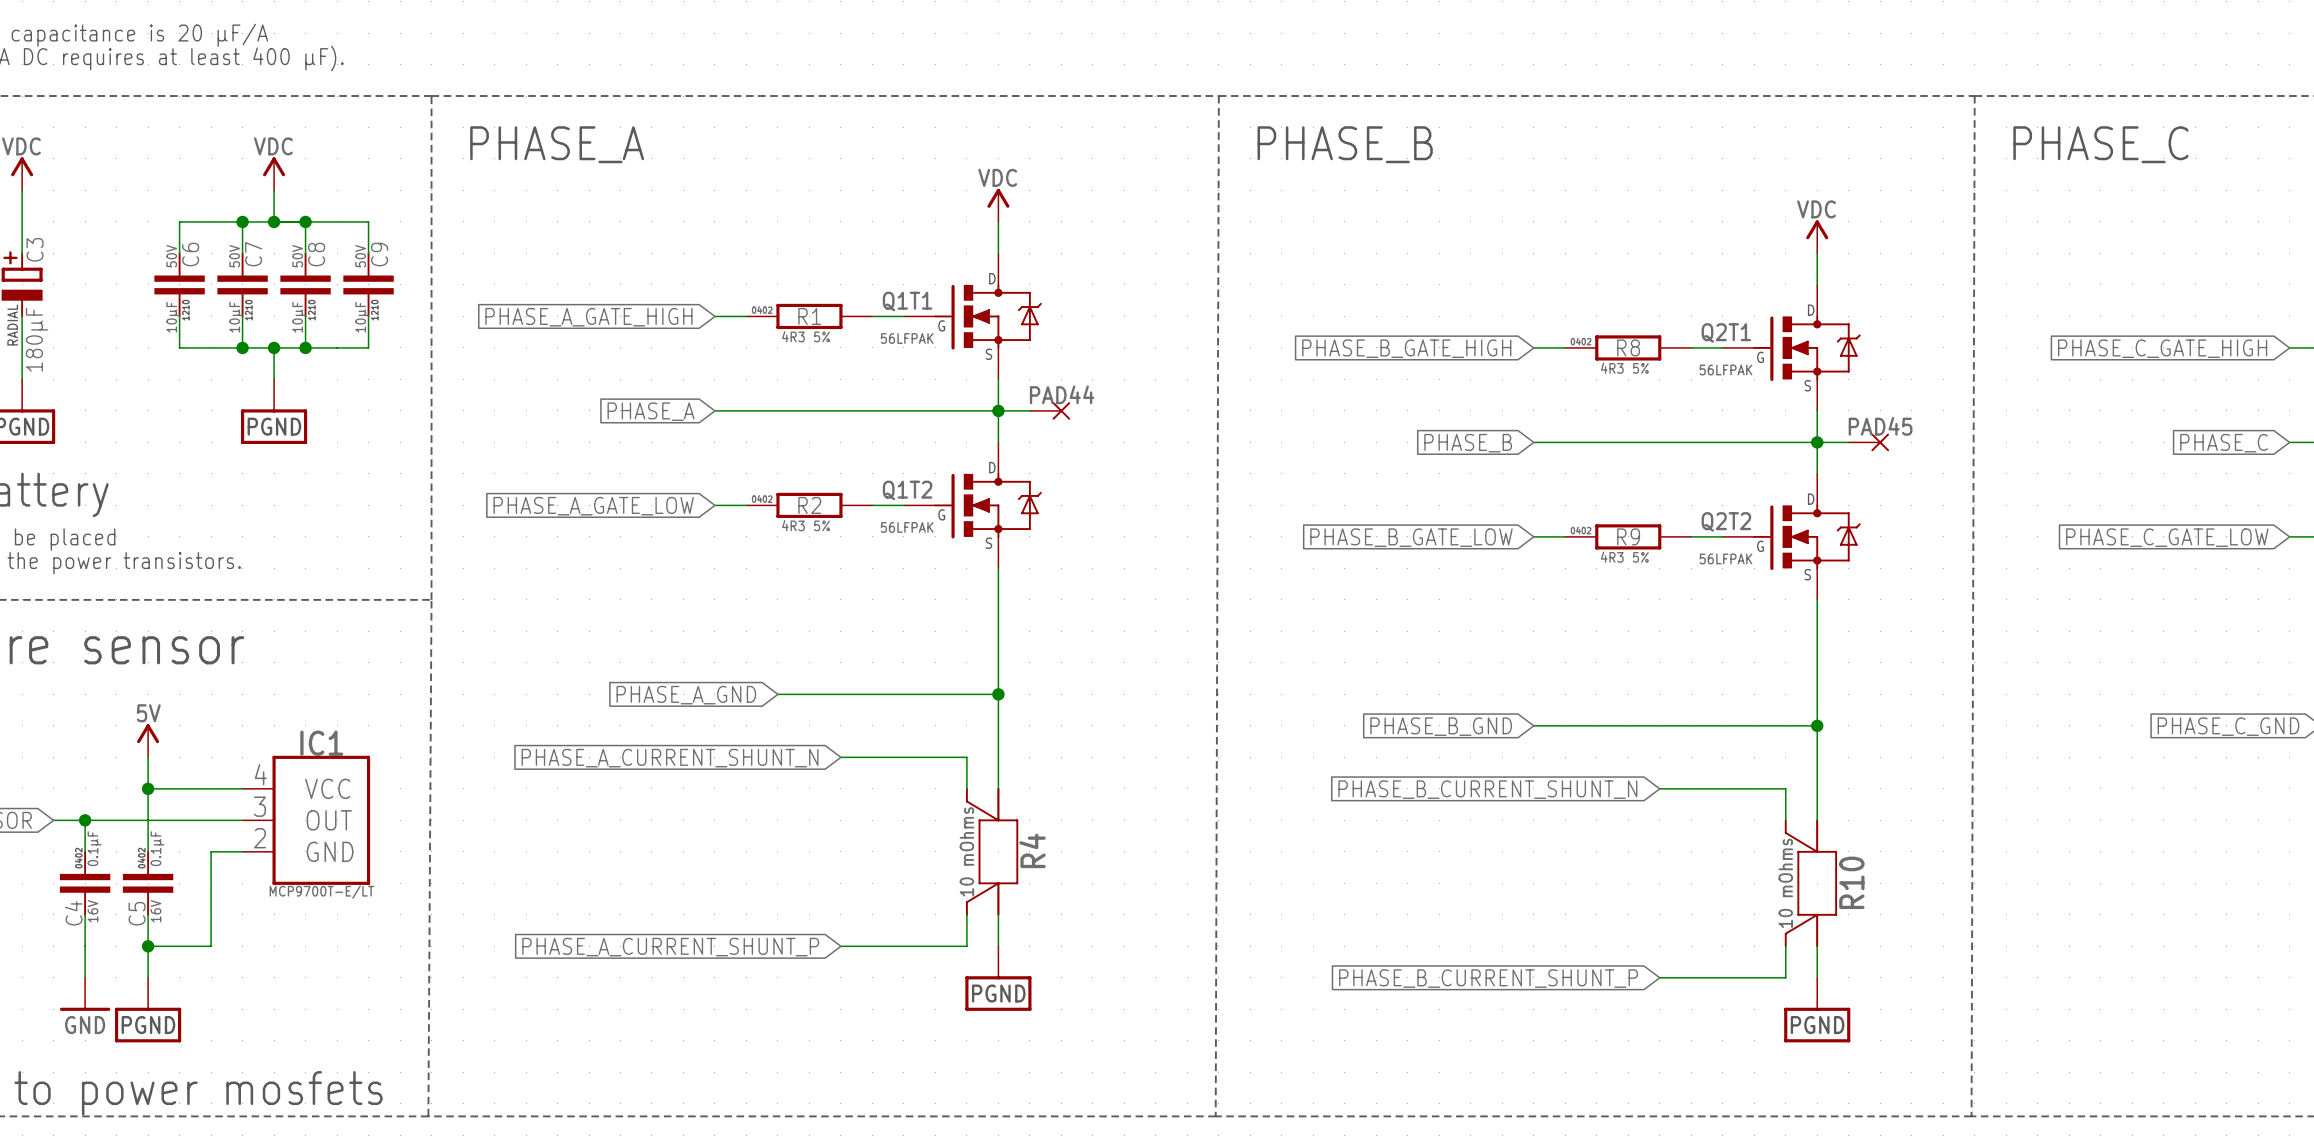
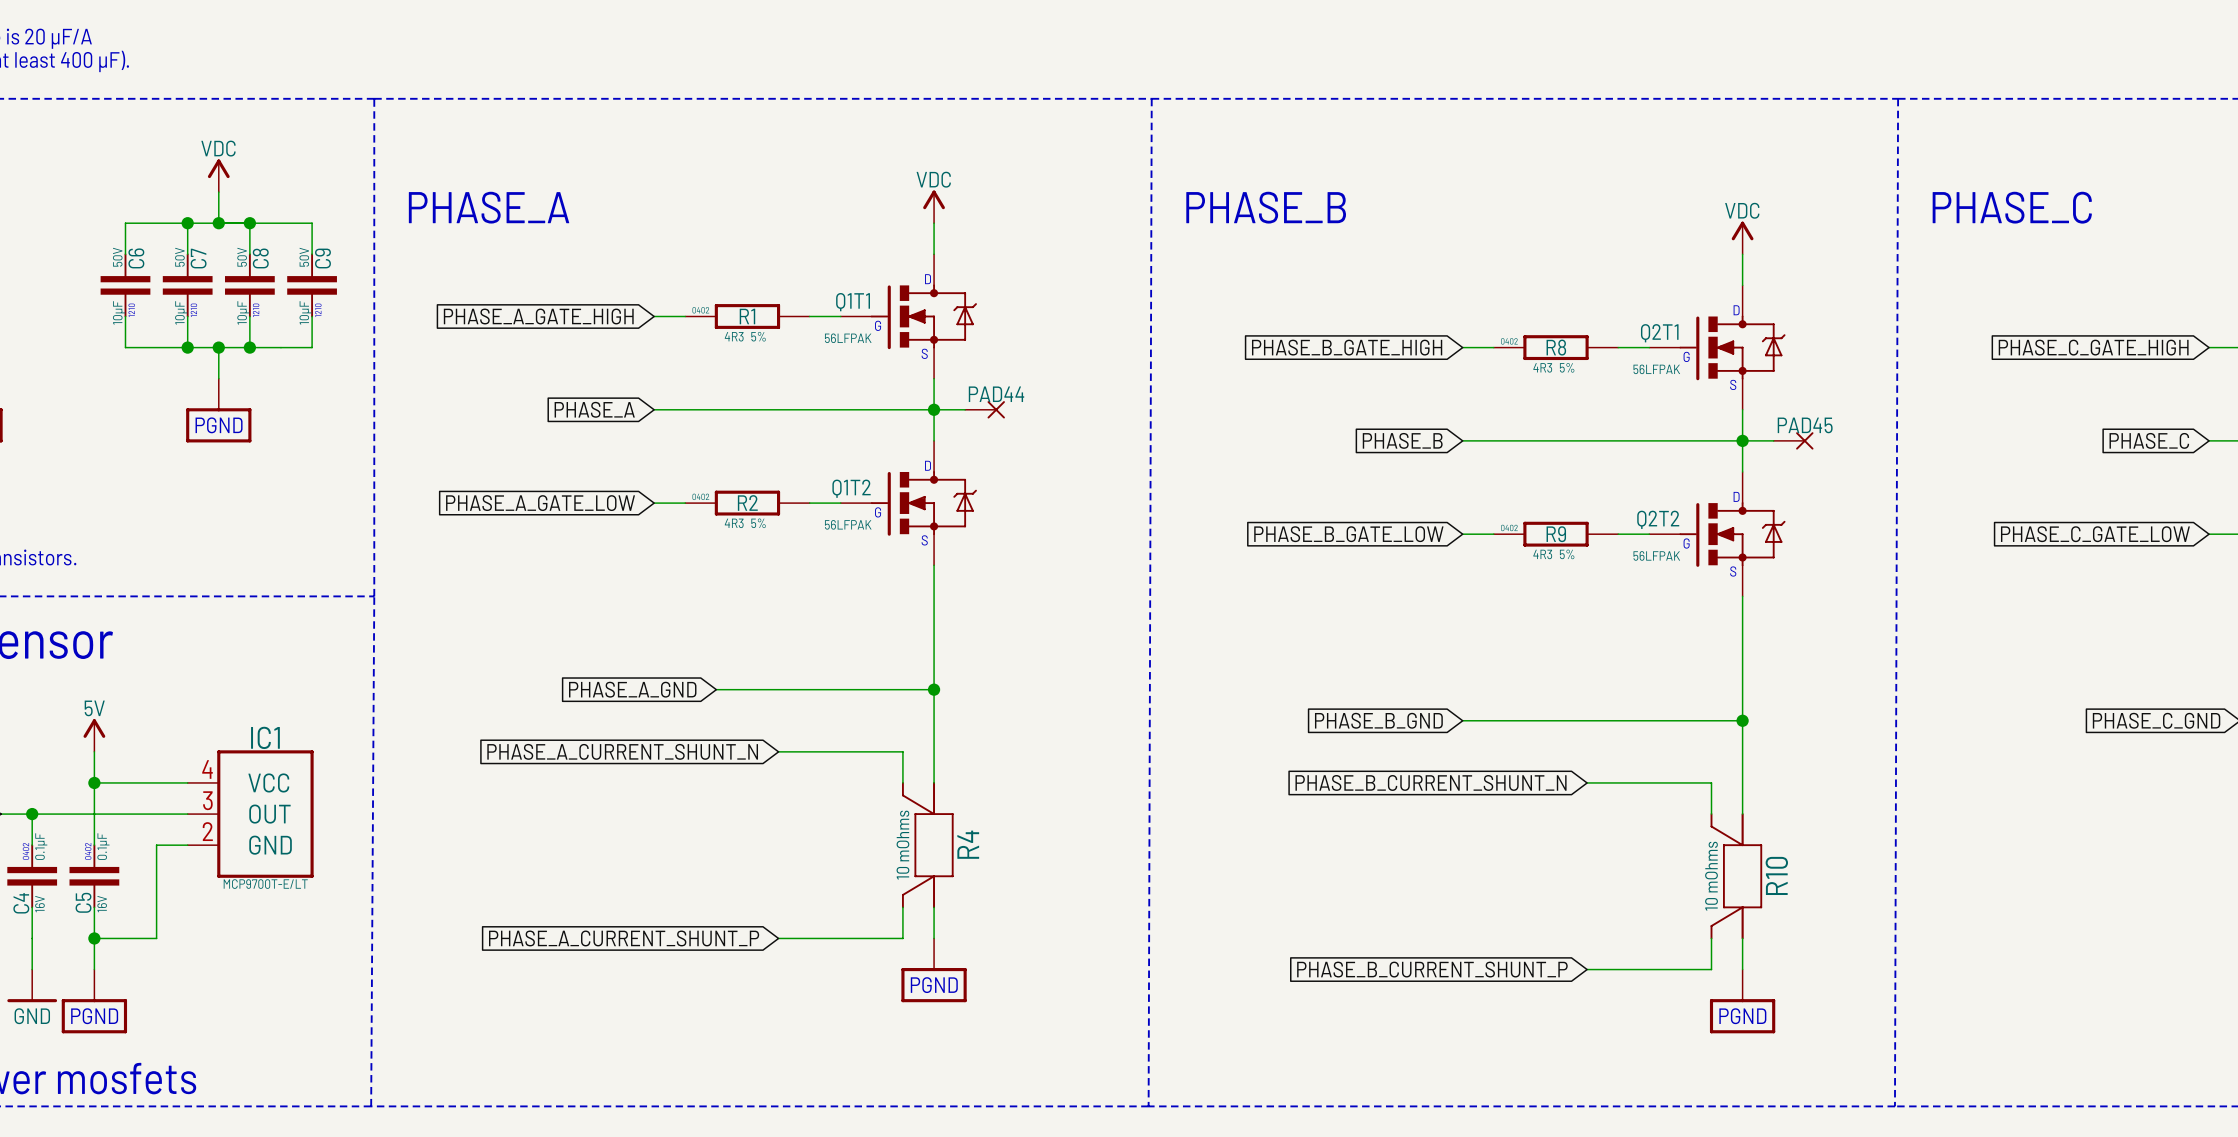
text position: PHASE_A (557, 144) -> PHASE_A (489, 207)
text position: PHASE_B (1345, 144) -> PHASE_B (1266, 207)
text position: PHASE_C (2100, 144) -> PHASE_C (2012, 207)

